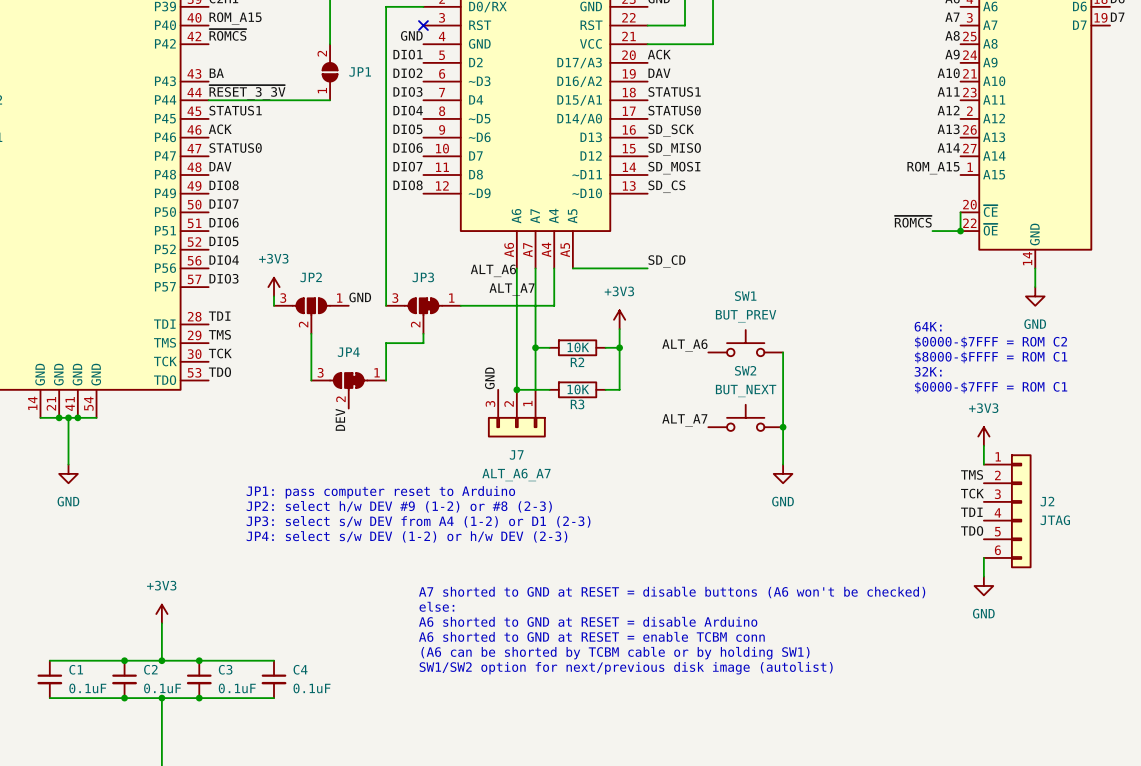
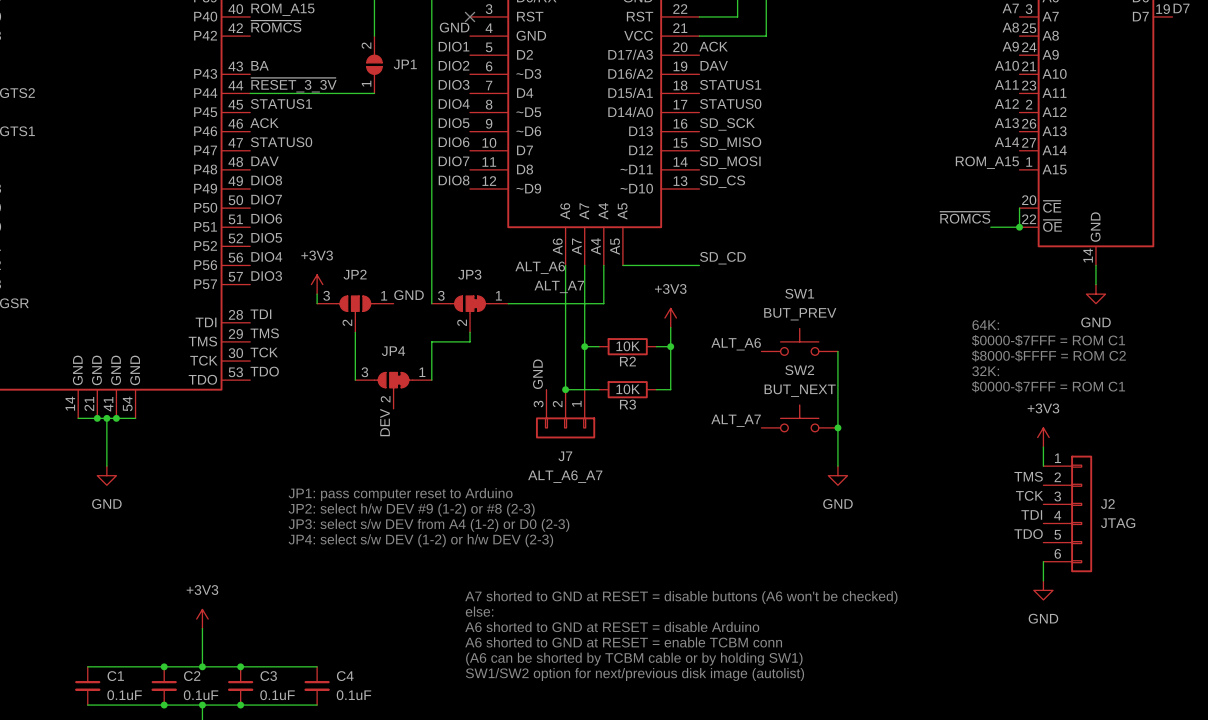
text: $0000-$7FFF = ROM C2 (991, 342) -> $0000-$7FFF = ROM C1 (1048, 340)
text: $8000-$FFFF = ROM C1 (991, 357) -> $8000-$FFFF = ROM C2 (1048, 355)
text: JP3: select s/w DEV from A4 (1-2) or D1 (2-3) (418, 521) -> JP3: select s/w DEV from A4 (1-2) or D0 (2-3) (429, 525)

